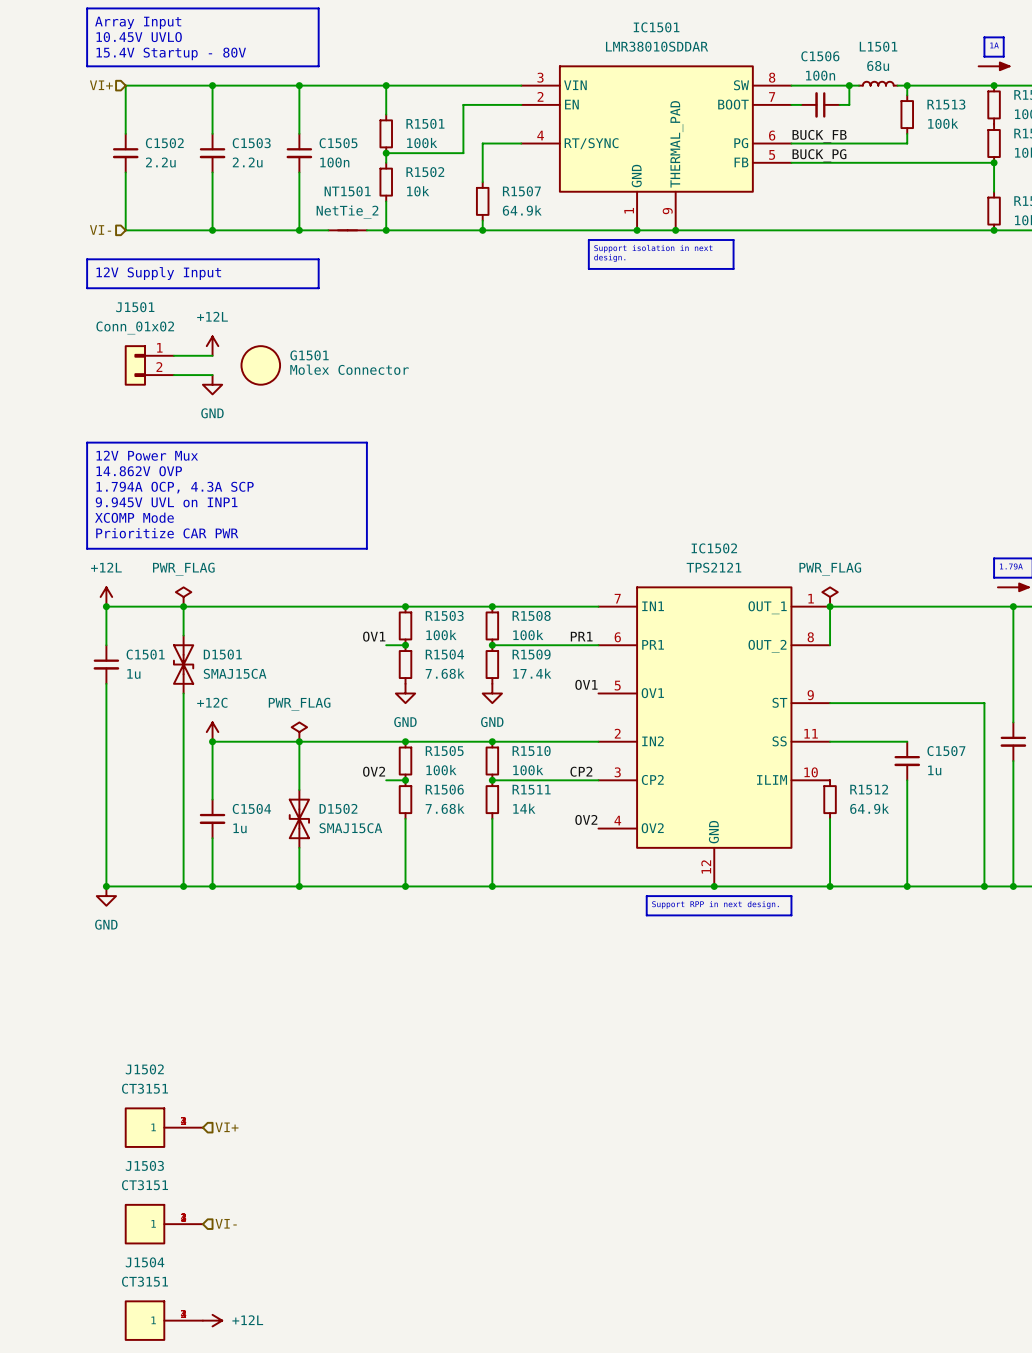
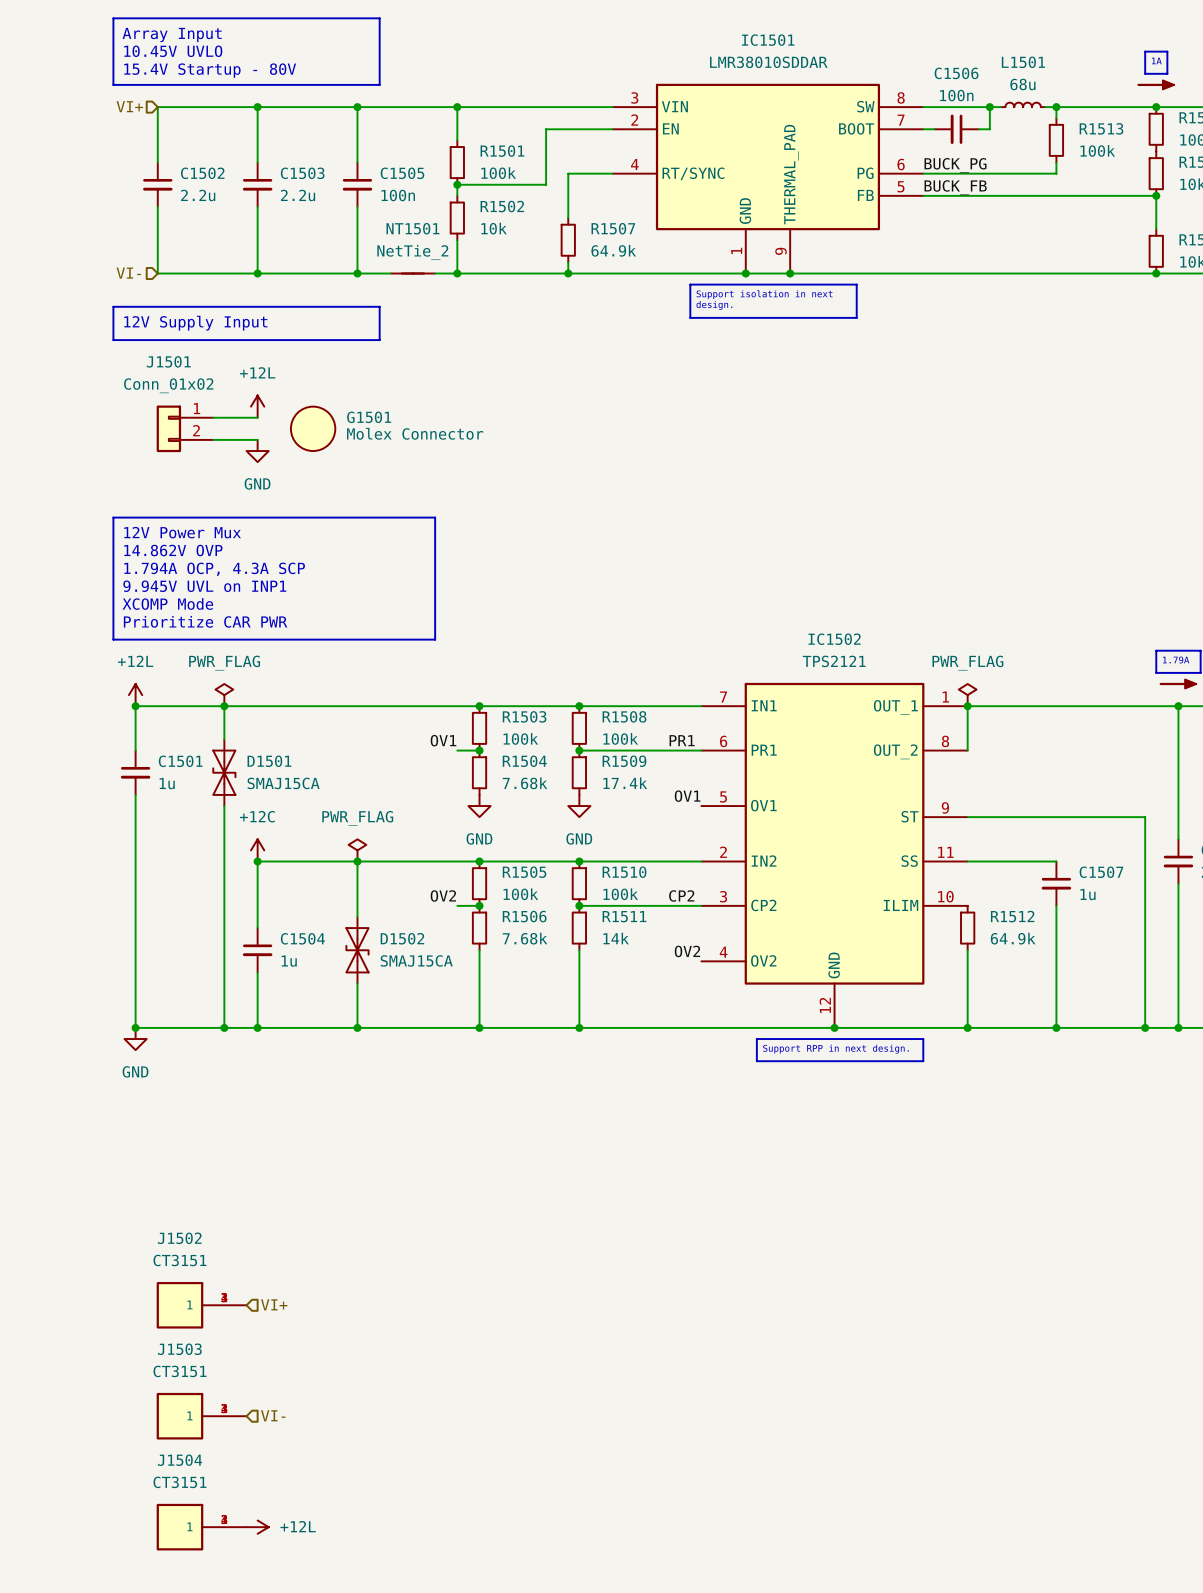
label: BUCK_FB (819, 136) -> BUCK_PG (955, 165)
label: BUCK_PG (819, 155) -> BUCK_FB (955, 187)

